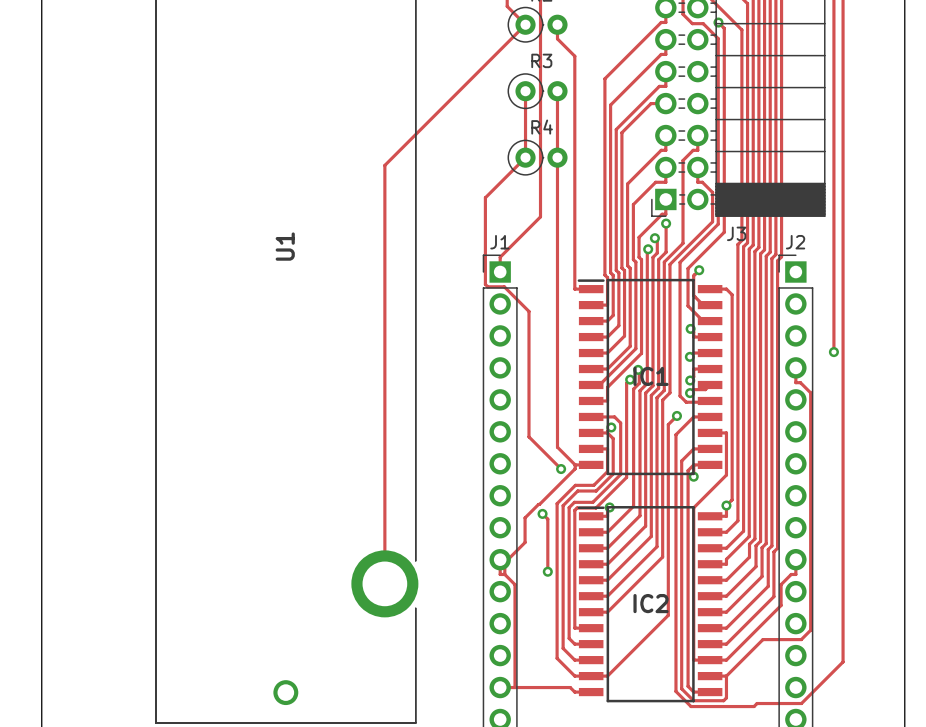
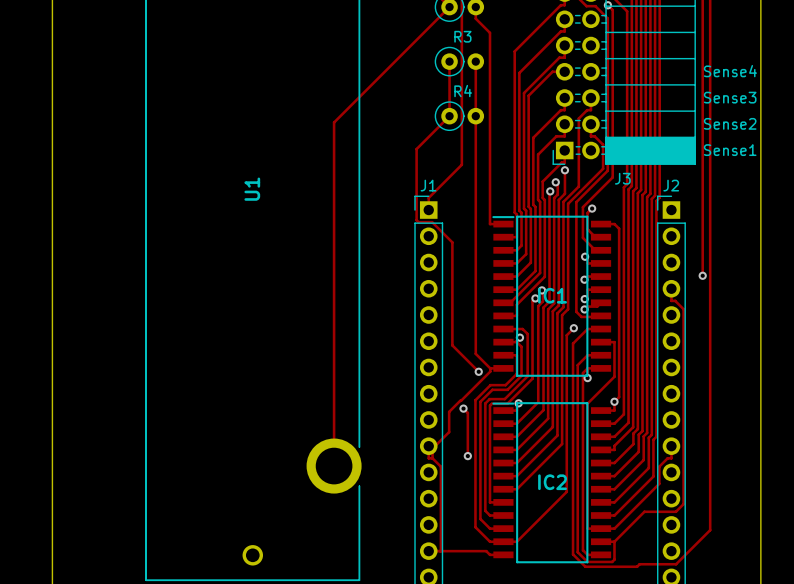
text: none -> Sense4 (730, 71)
text: none -> Sense3 (730, 97)
text: none -> Sense2 (730, 123)
text: none -> Sense1 (730, 150)

